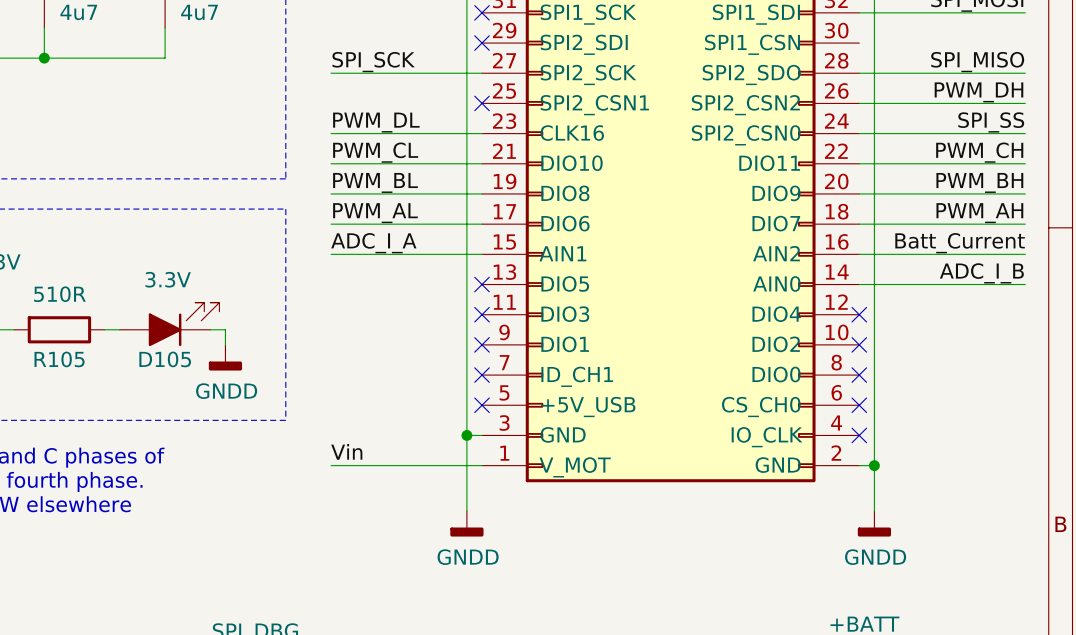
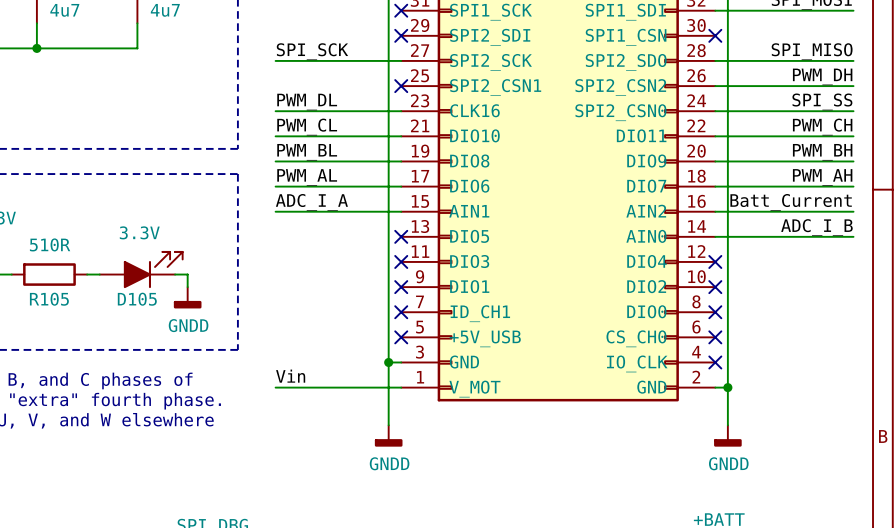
no-connect mark: none -> (715, 35)

